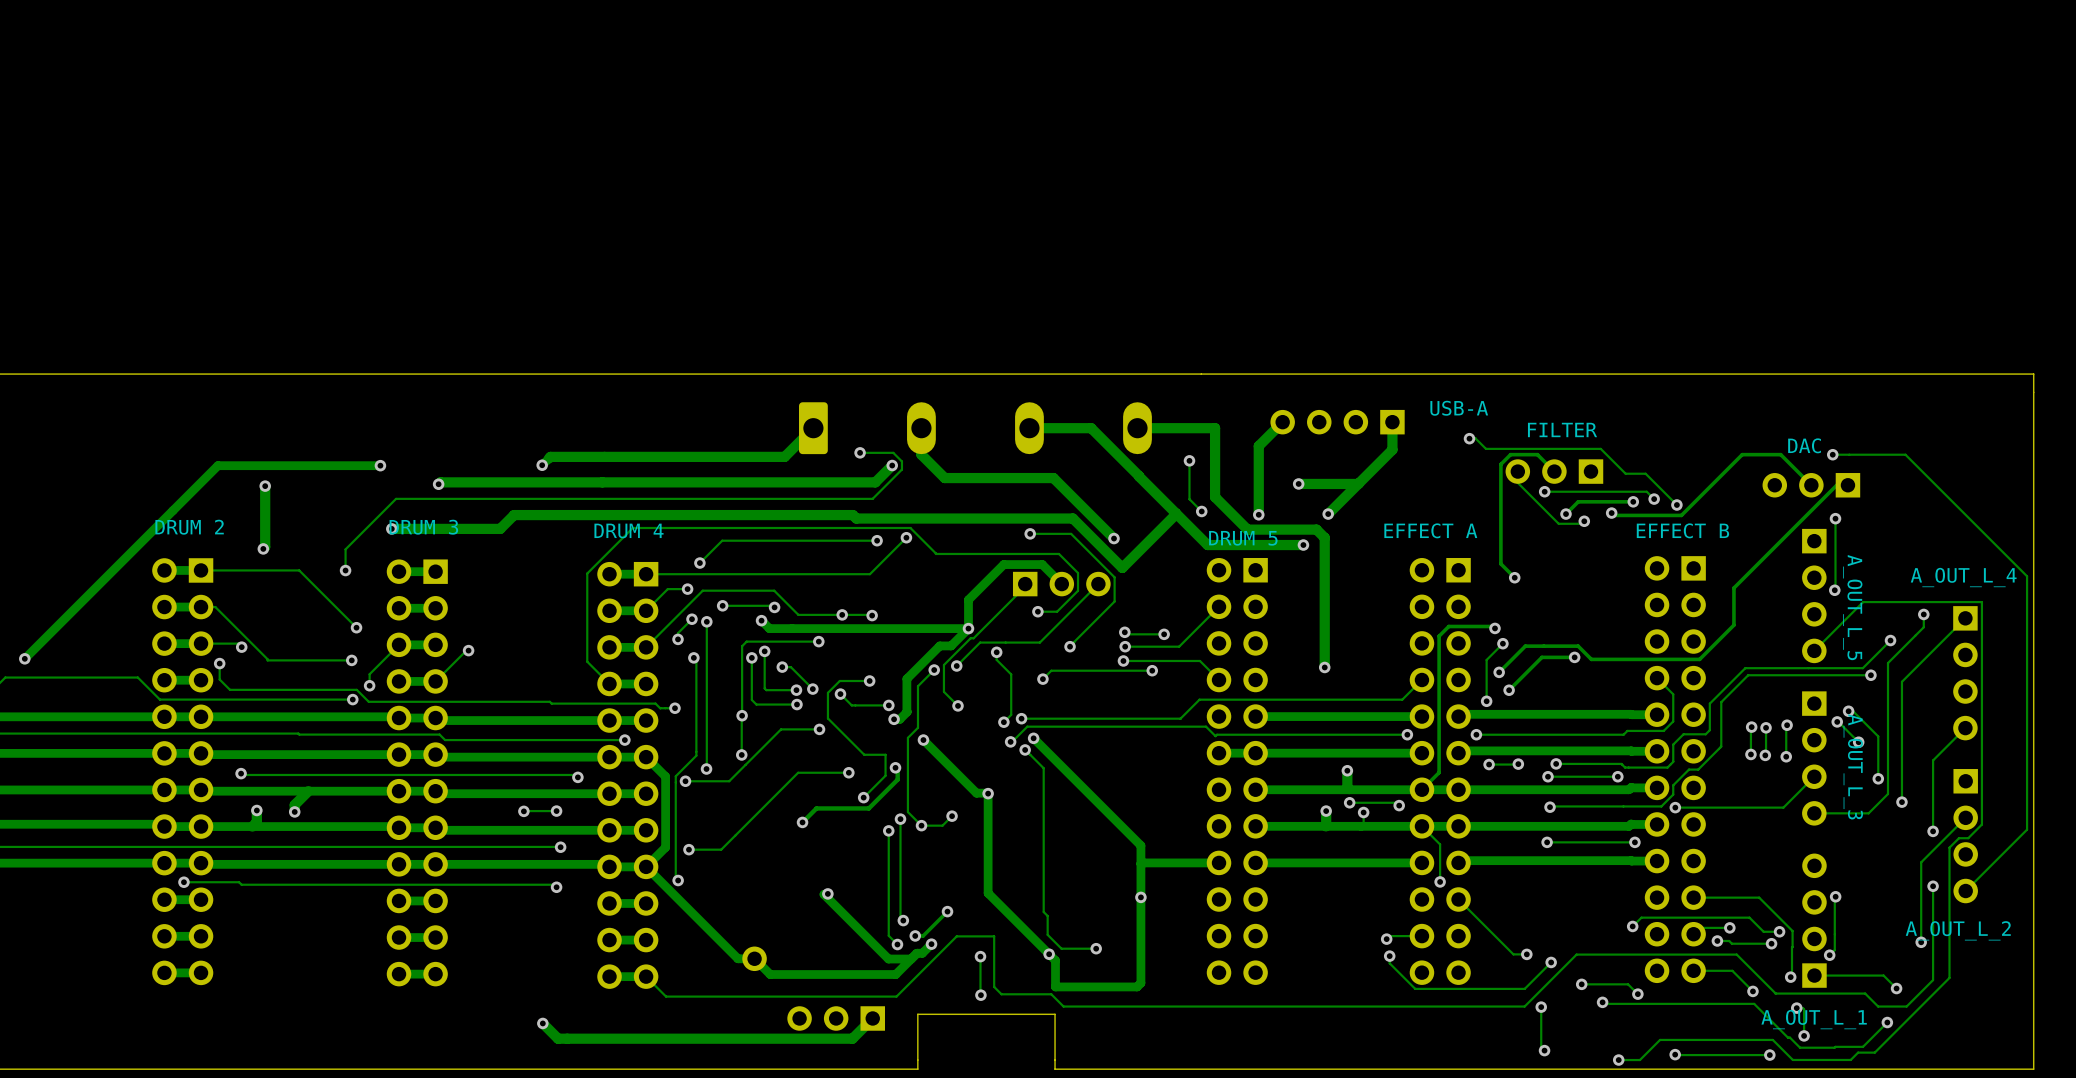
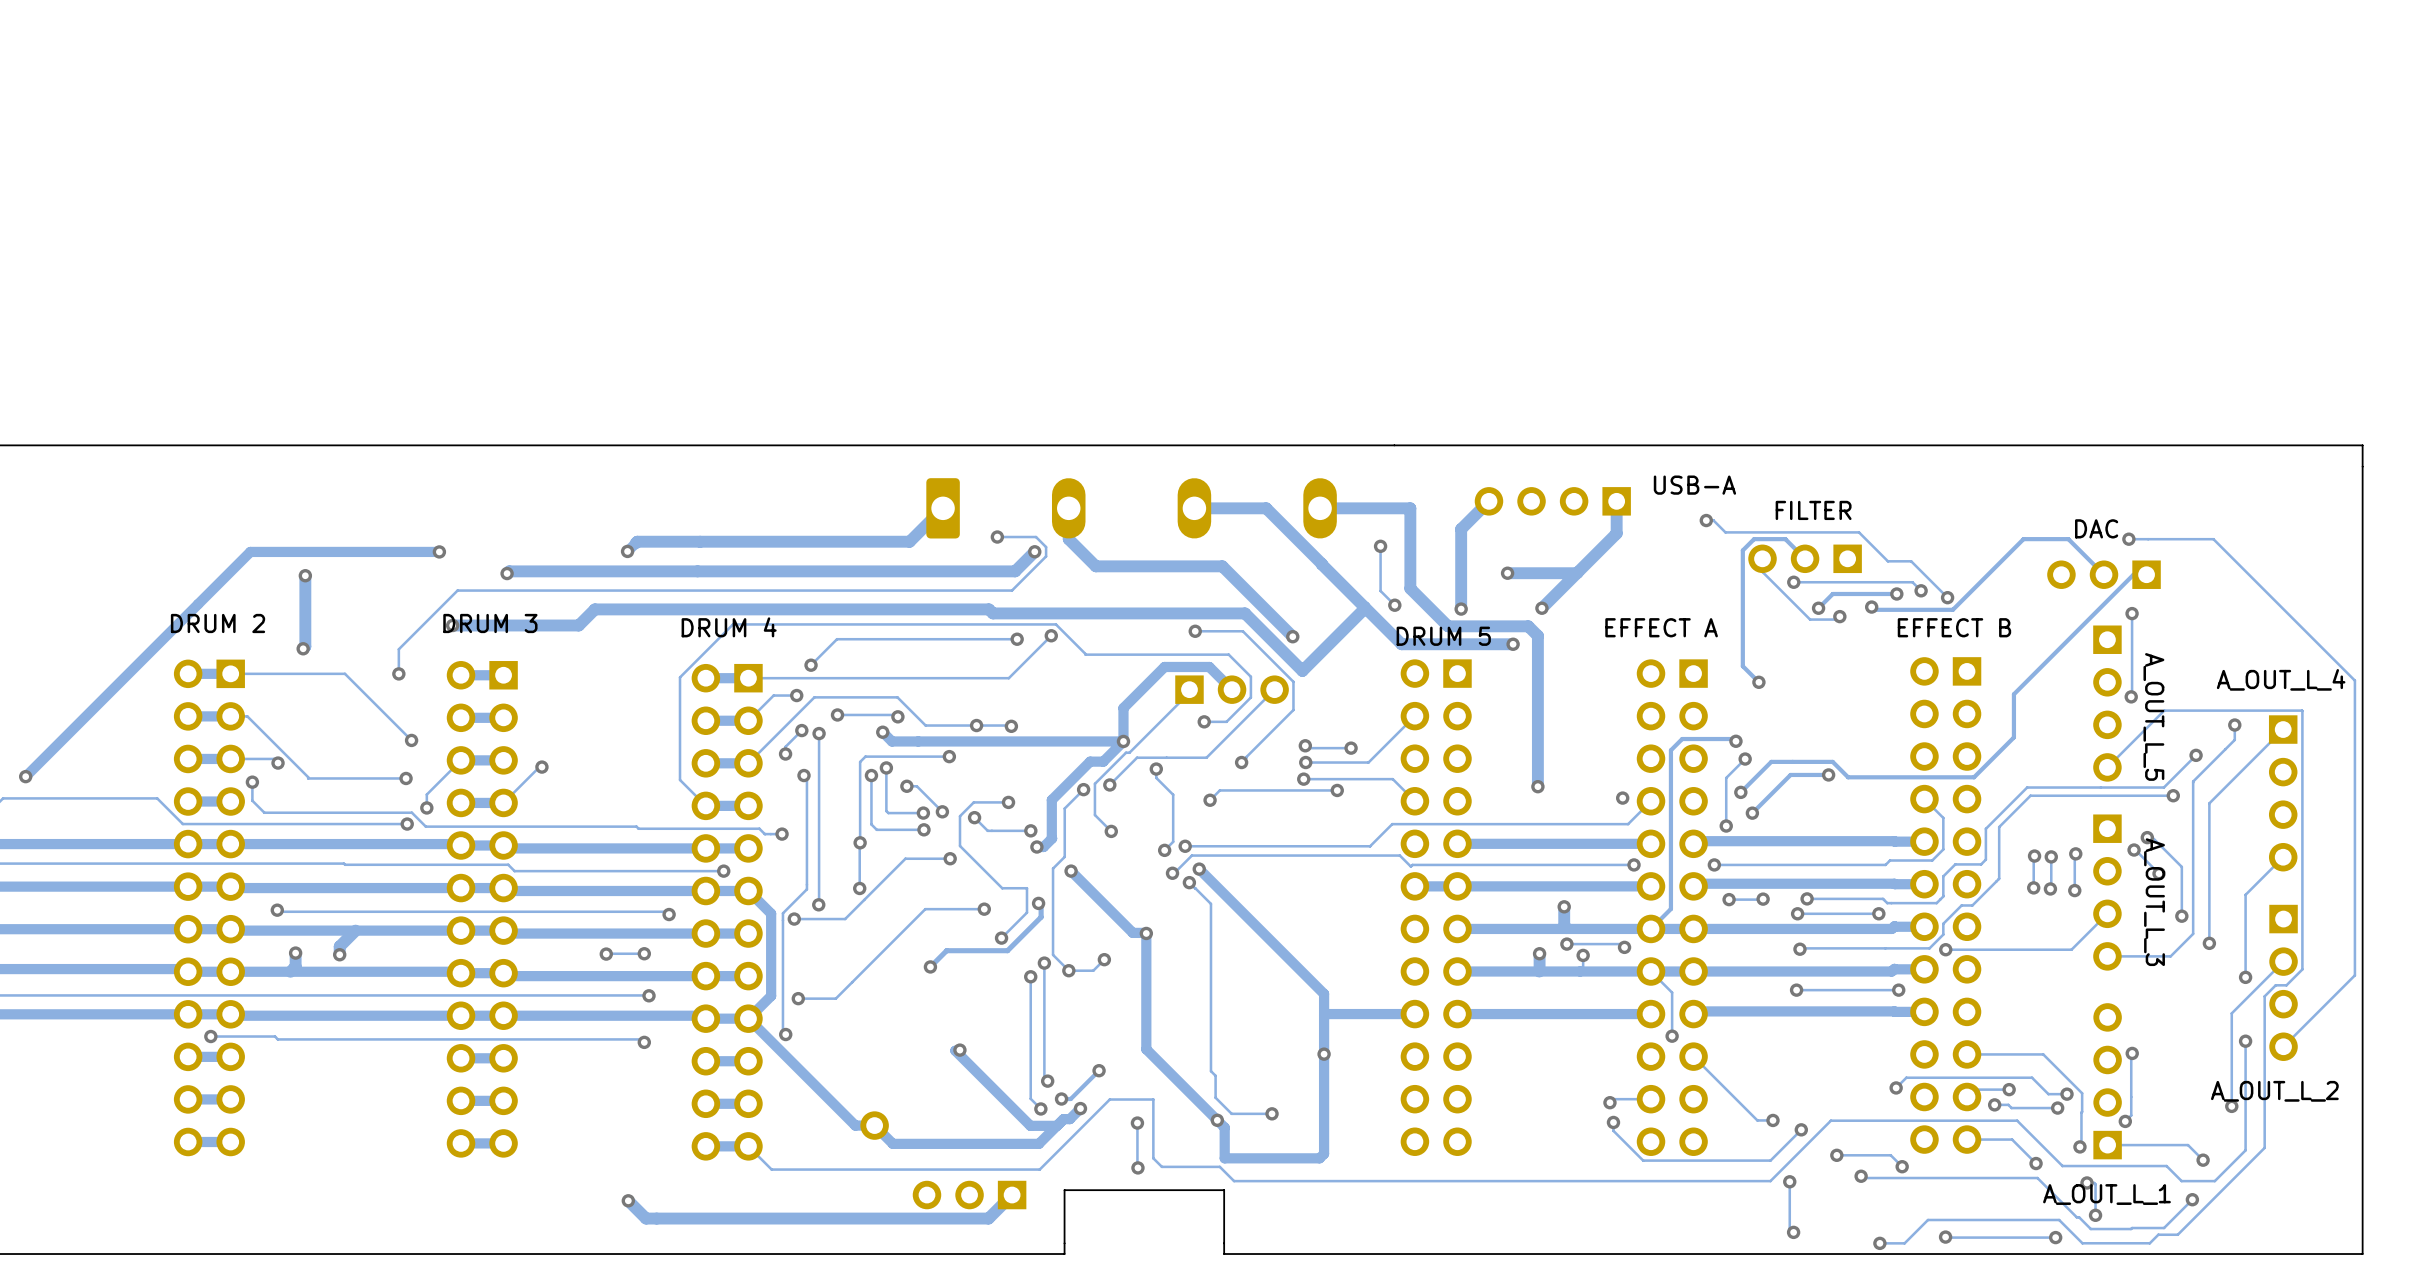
via: none -> (1622, 798)

